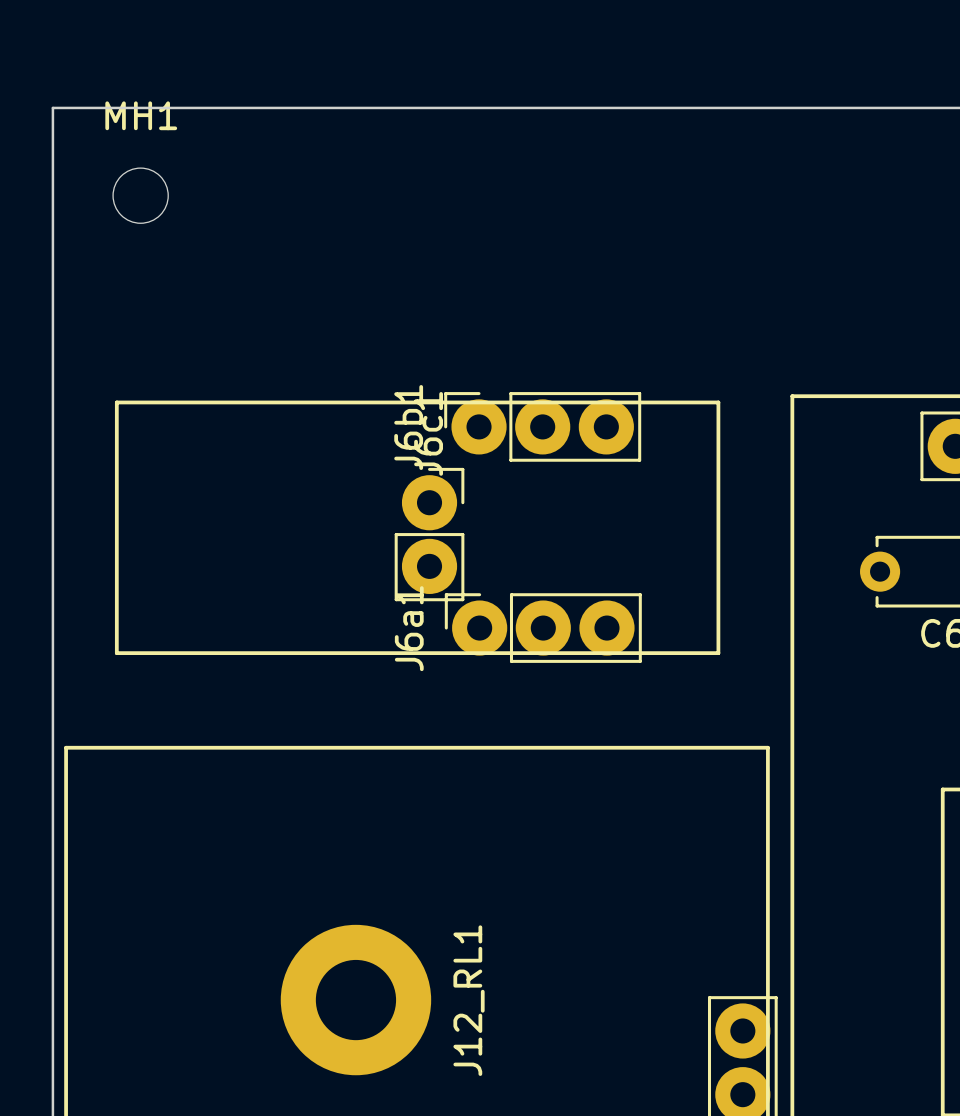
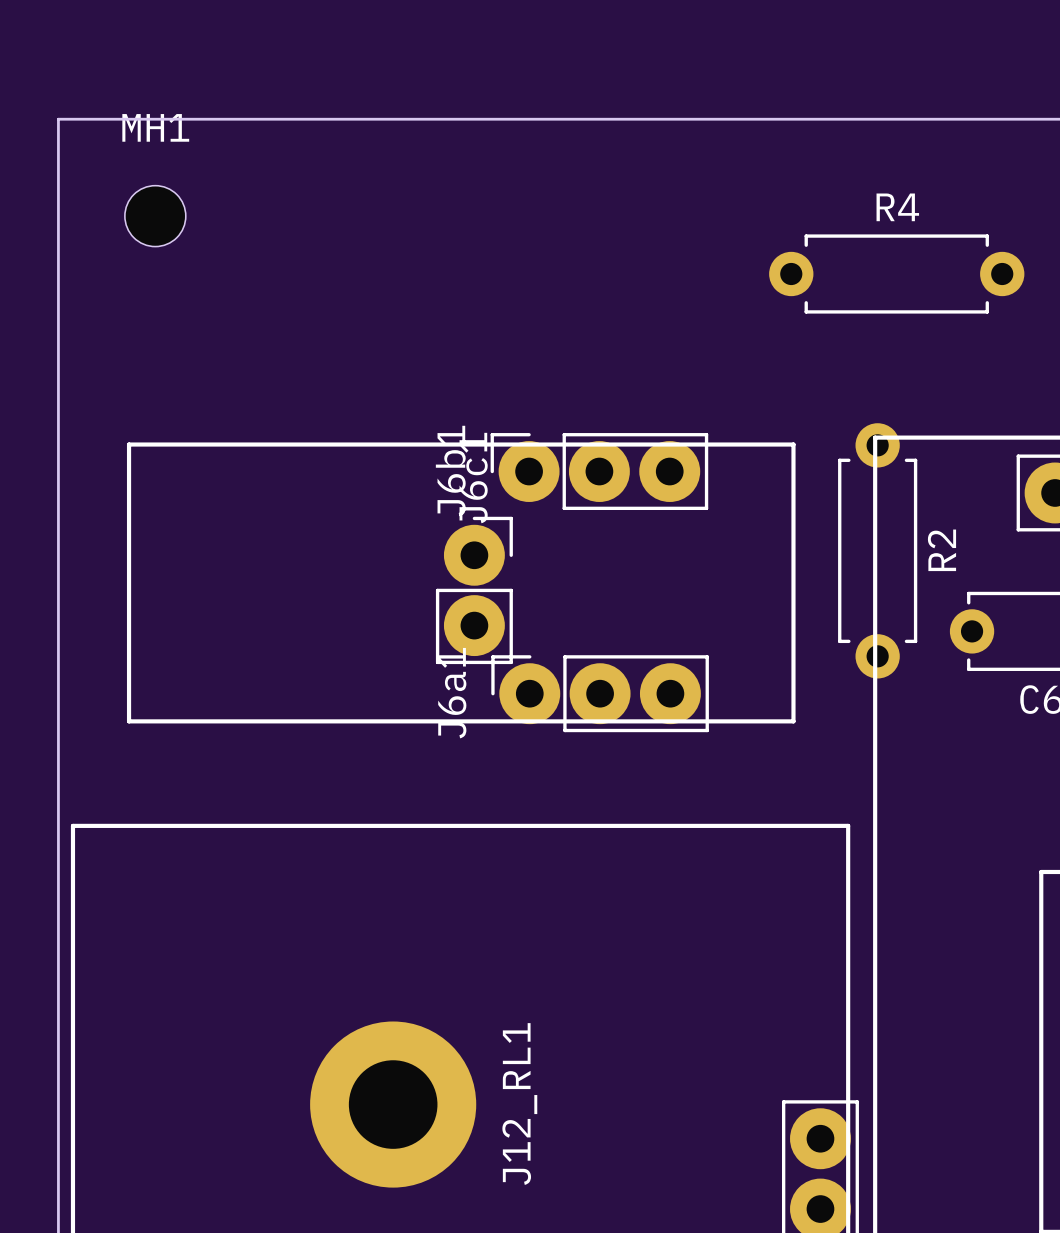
R4: none -> (896, 274)
R2: none -> (877, 550)

